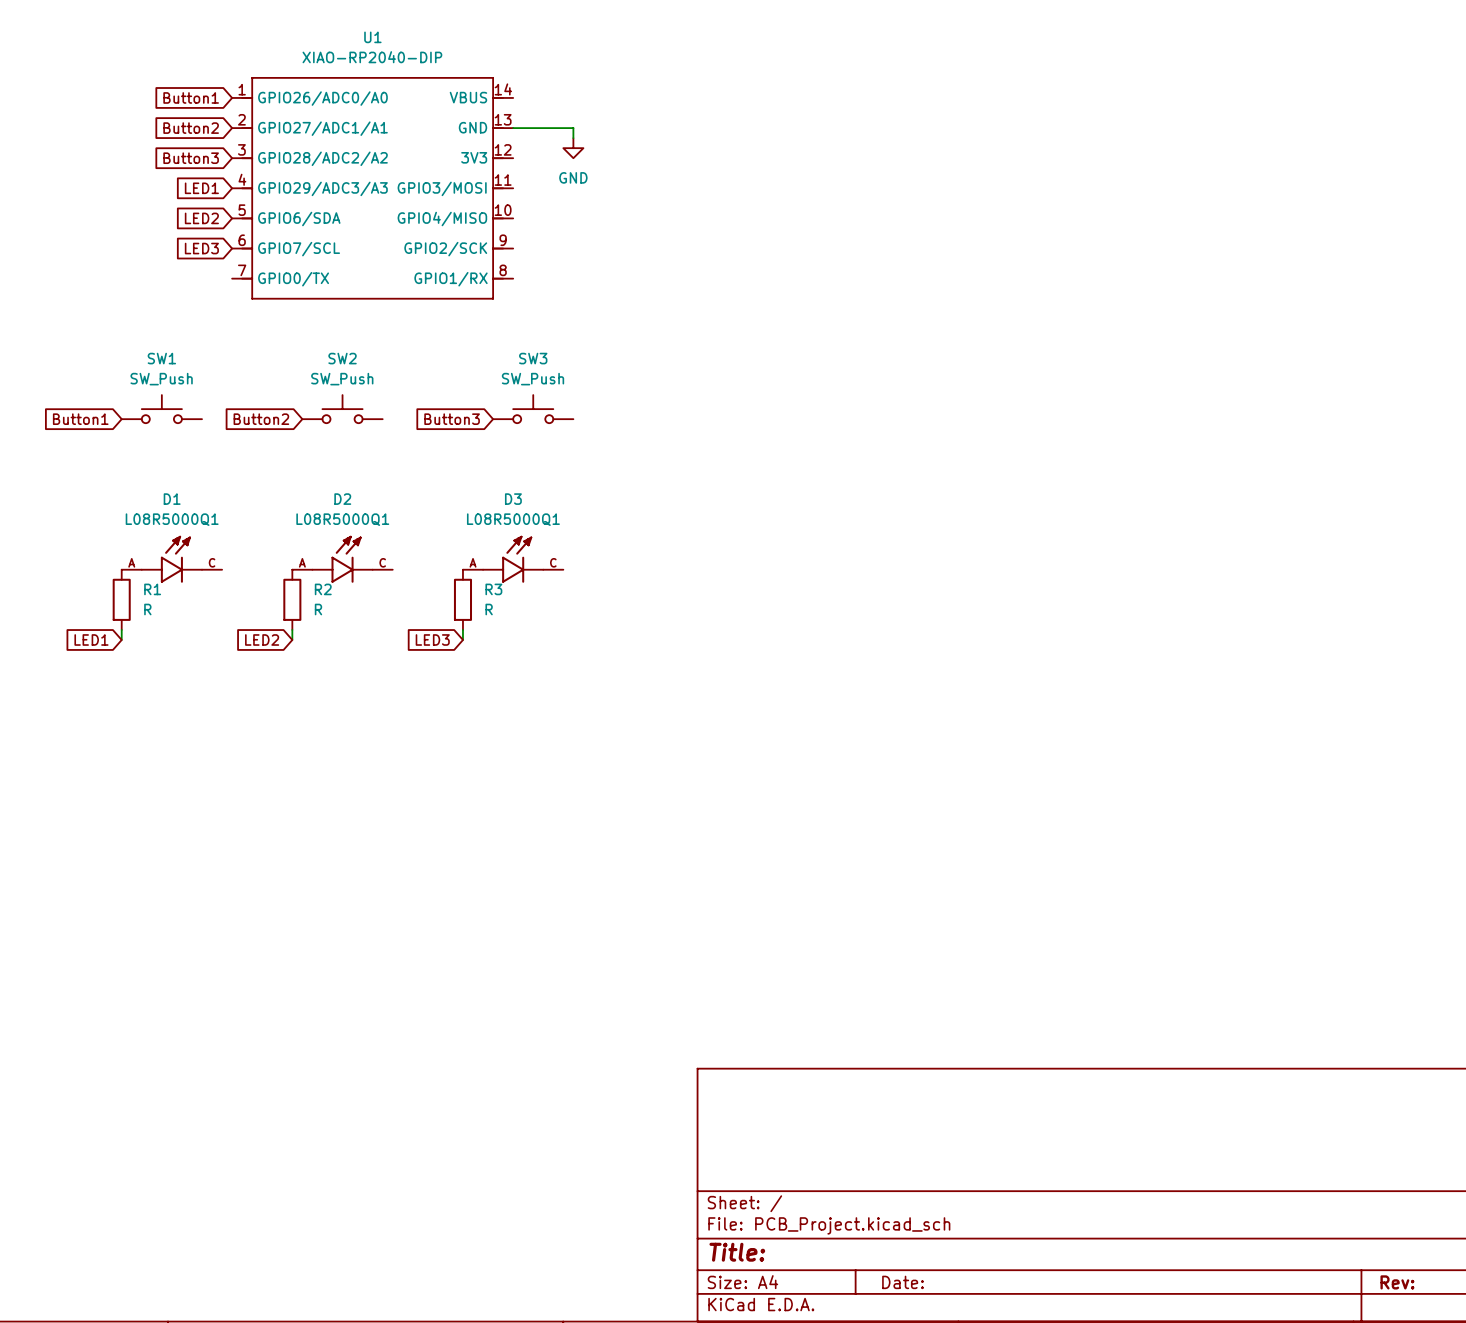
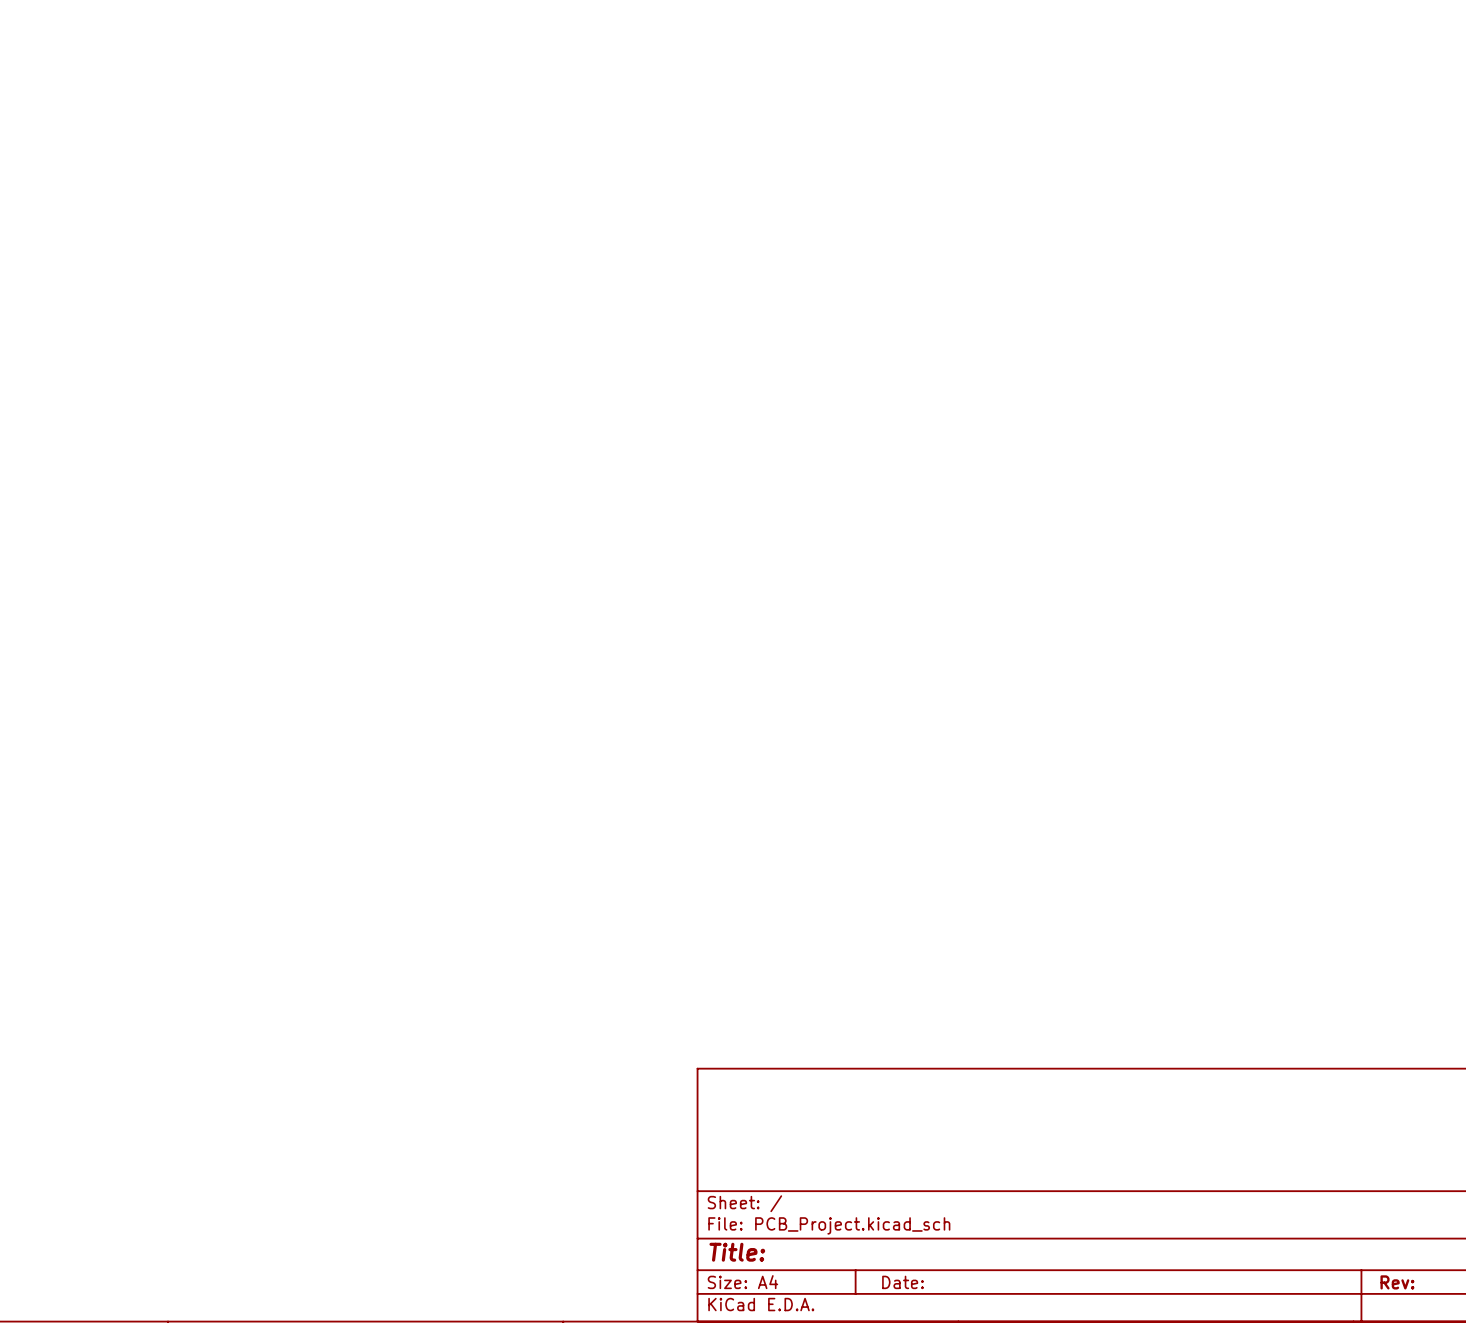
global label: Button1 (191, 97) -> none
global label: Button2 (191, 128) -> none
wire: (513, 128) (573, 128) (573, 138) -> none
power symbol: GND (573, 148) -> none
global label: Button3 (191, 158) -> none
global label: LED1 (201, 188) -> none
U1: XIAO-RP2040-DIP (372, 188) -> none
global label: LED2 (201, 218) -> none
global label: LED3 (201, 248) -> none
SW1: SW_Push (161, 409) -> none
SW2: SW_Push (342, 409) -> none
SW3: SW_Push (533, 409) -> none
global label: Button1 (80, 419) -> none
global label: Button2 (261, 419) -> none
global label: Button3 (452, 419) -> none
D1: L08R5000Q1 (171, 559) -> none
D2: L08R5000Q1 (342, 559) -> none
D3: L08R5000Q1 (513, 559) -> none
R1: R (121, 599) -> none
R2: R (292, 599) -> none
R3: R (462, 599) -> none
wire: (121, 629) (121, 639) -> none
wire: (292, 629) (292, 639) -> none
wire: (462, 629) (462, 639) -> none
global label: LED1 (91, 639) -> none
global label: LED2 (262, 639) -> none
global label: LED3 (432, 639) -> none

